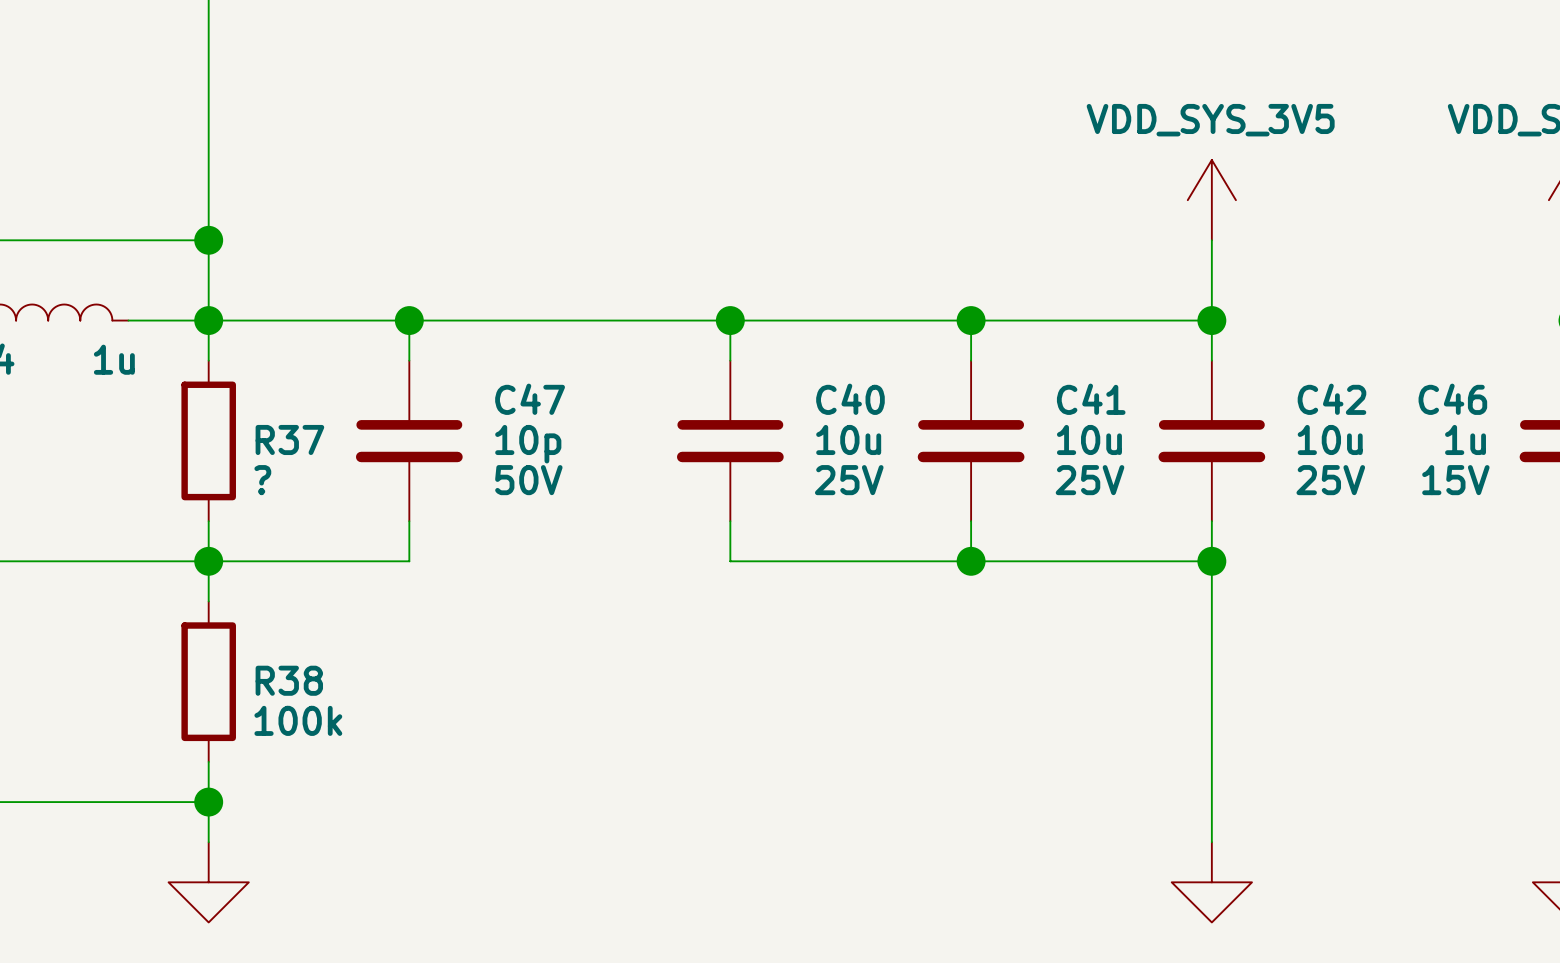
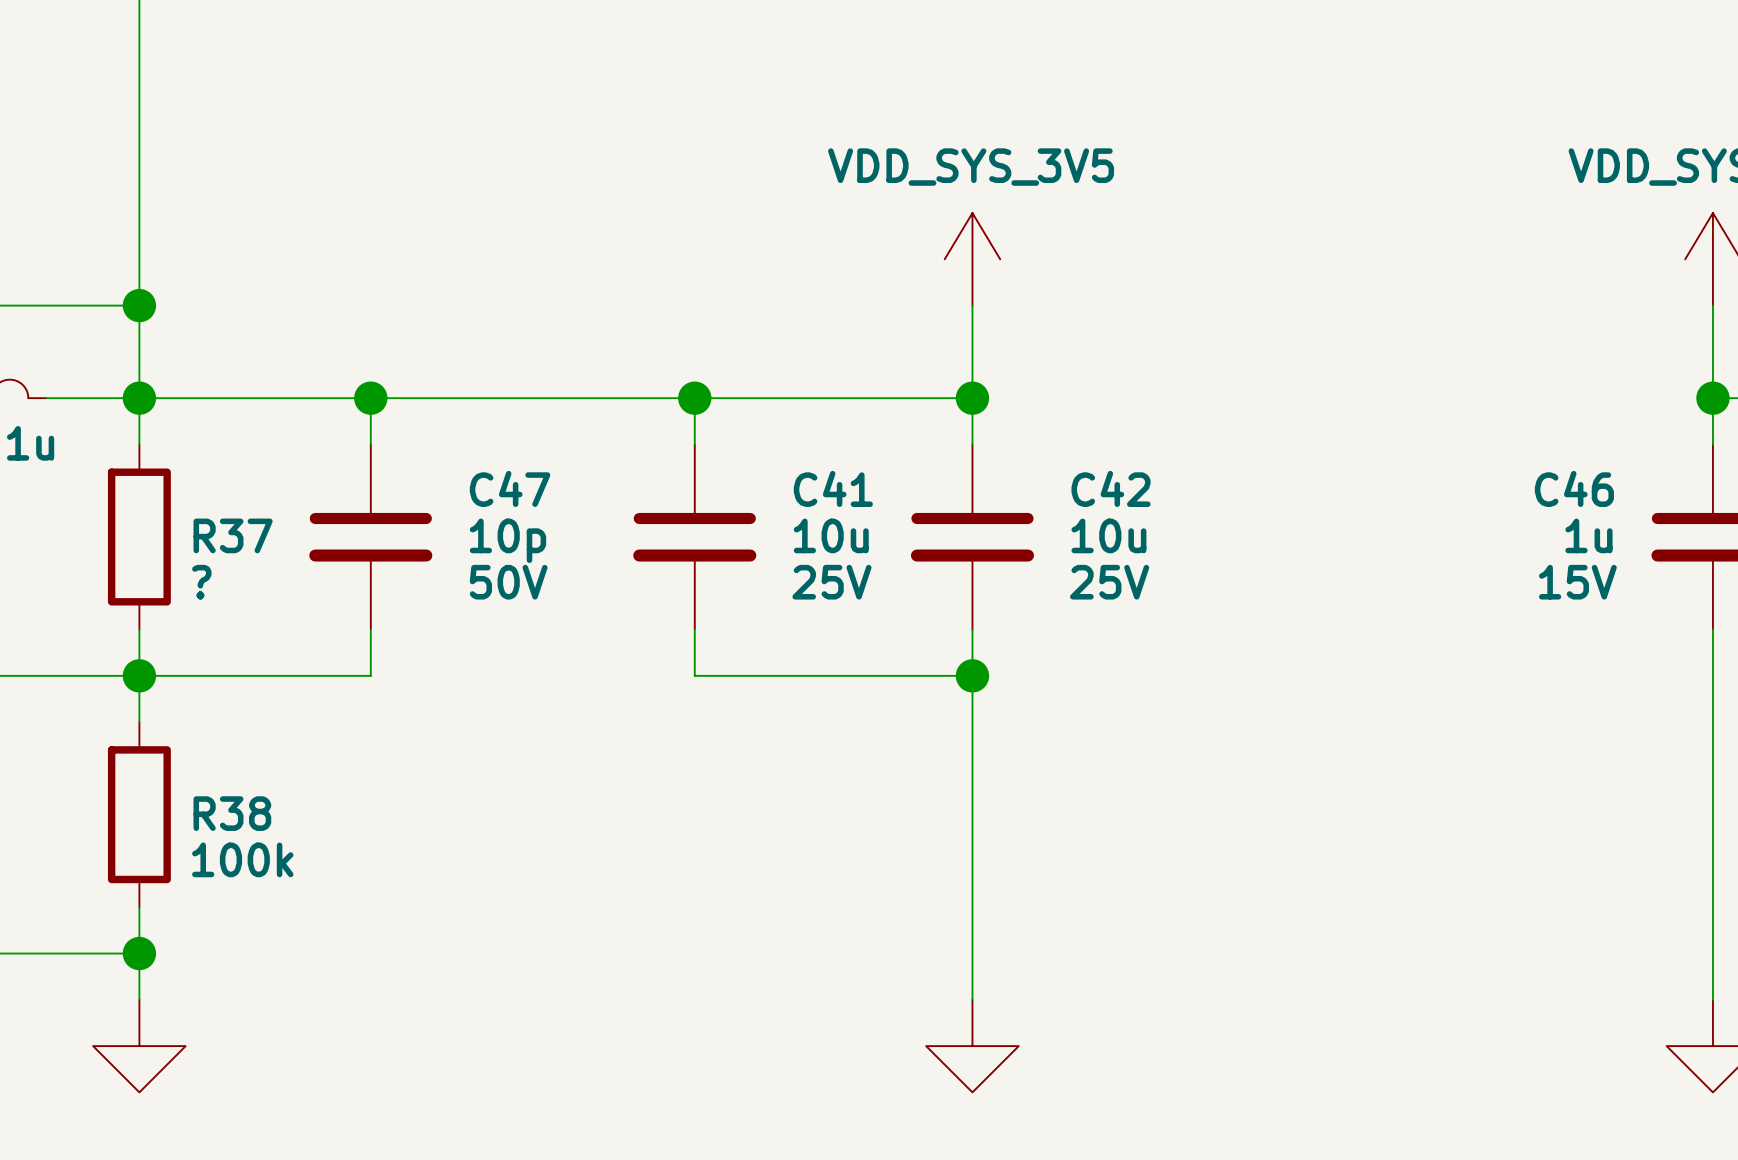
power symbol position: VDD_SYS_3V5 (1211, 200) -> VDD_SYS_3V5 (972, 259)
wire: (1211, 240) (1211, 360) -> (972, 305) (972, 444)
wire: (730, 320) (730, 360) -> none
junction position: (730, 320) -> (694, 398)
wire: (930, 320) (1211, 320) -> none
wire: (971, 320) (971, 360) -> (694, 398) (694, 444)
junction position: (971, 320) -> (972, 398)
junction: (1211, 320) -> none
C40: 10u (730, 440) -> none
C41 position: (971, 440) -> (694, 537)
C42 position: (1211, 440) -> (972, 537)
wire: (730, 521) (730, 561) -> (694, 629) (694, 675) (741, 675)
wire: (971, 521) (971, 561) -> none
wire: (1211, 521) (1211, 842) -> (972, 629) (972, 999)
wire: (930, 561) (1211, 561) -> none
junction position: (971, 561) -> (972, 675)
junction: (1211, 561) -> none
power symbol position: (1211, 882) -> (972, 1046)

